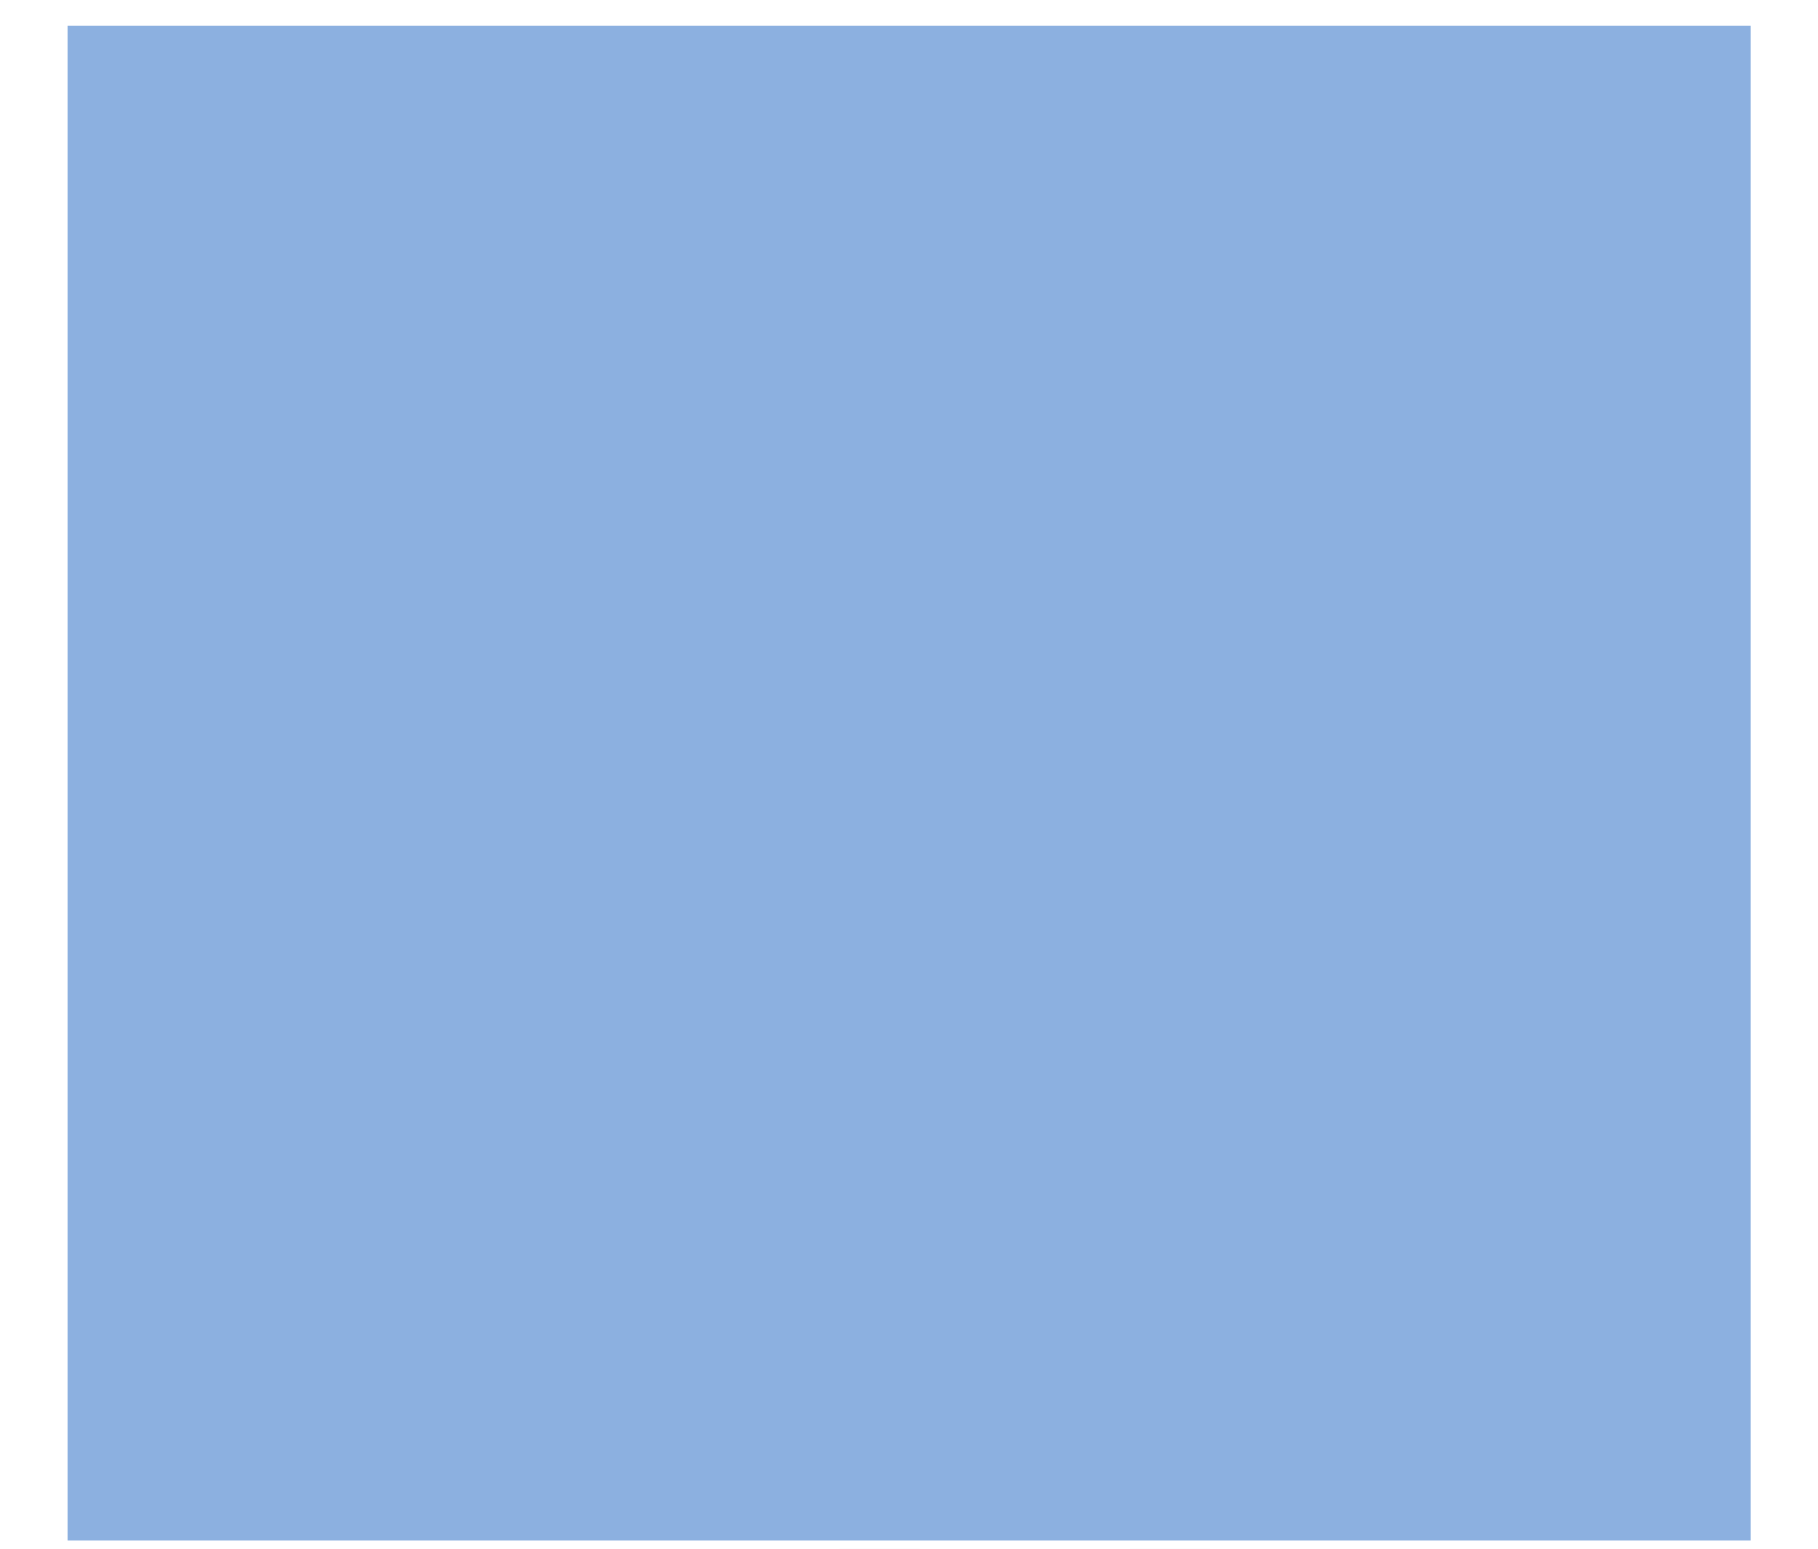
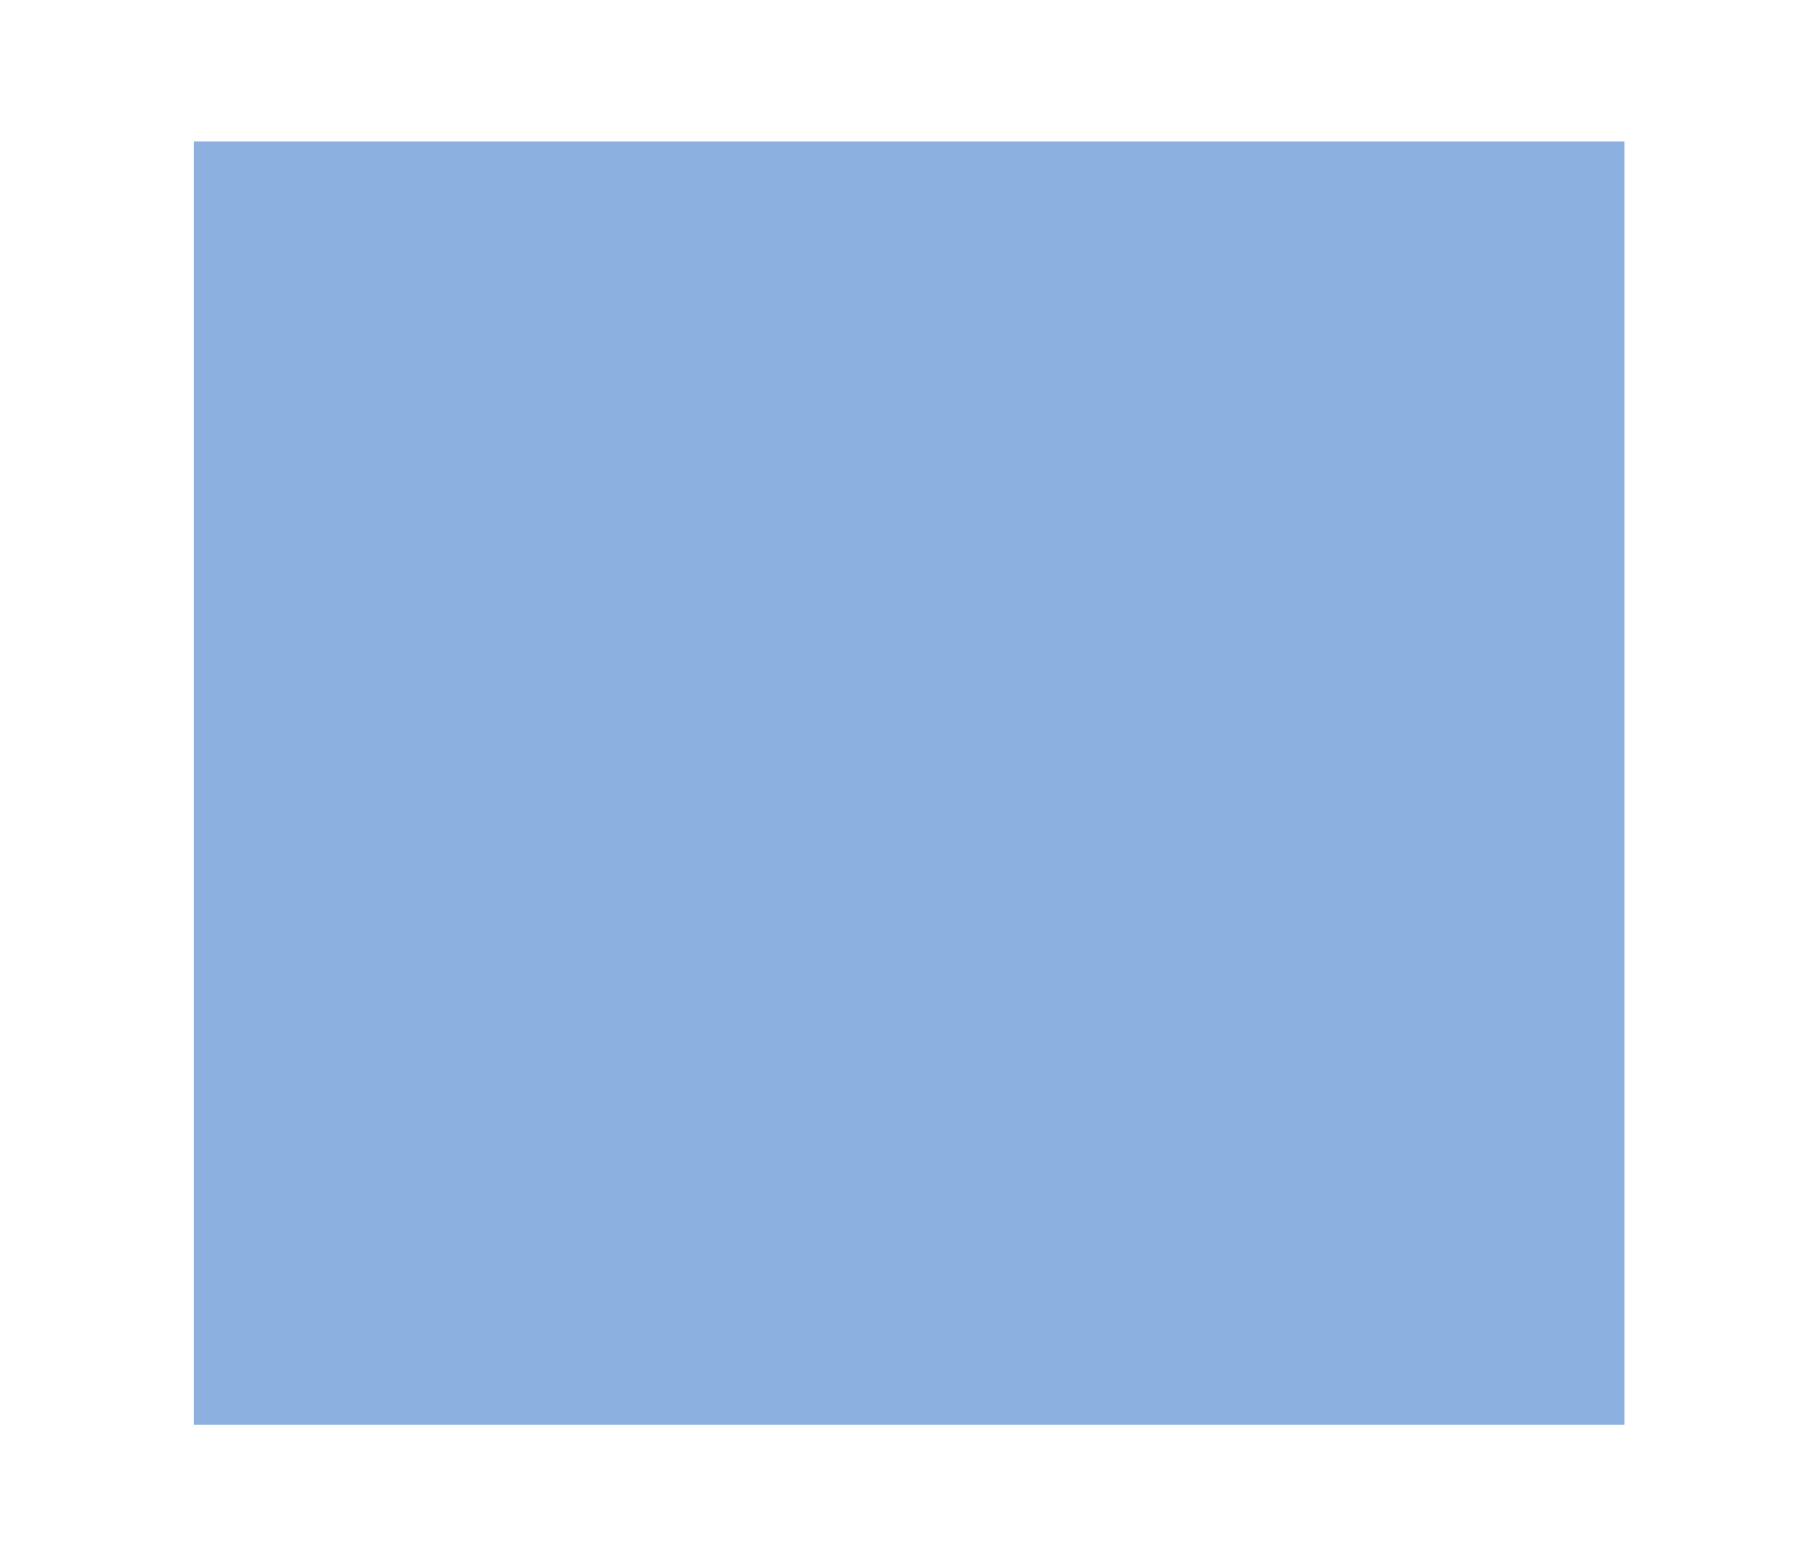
part footprint: [67, 25, 1751, 1541] -> [193, 141, 1625, 1425]

